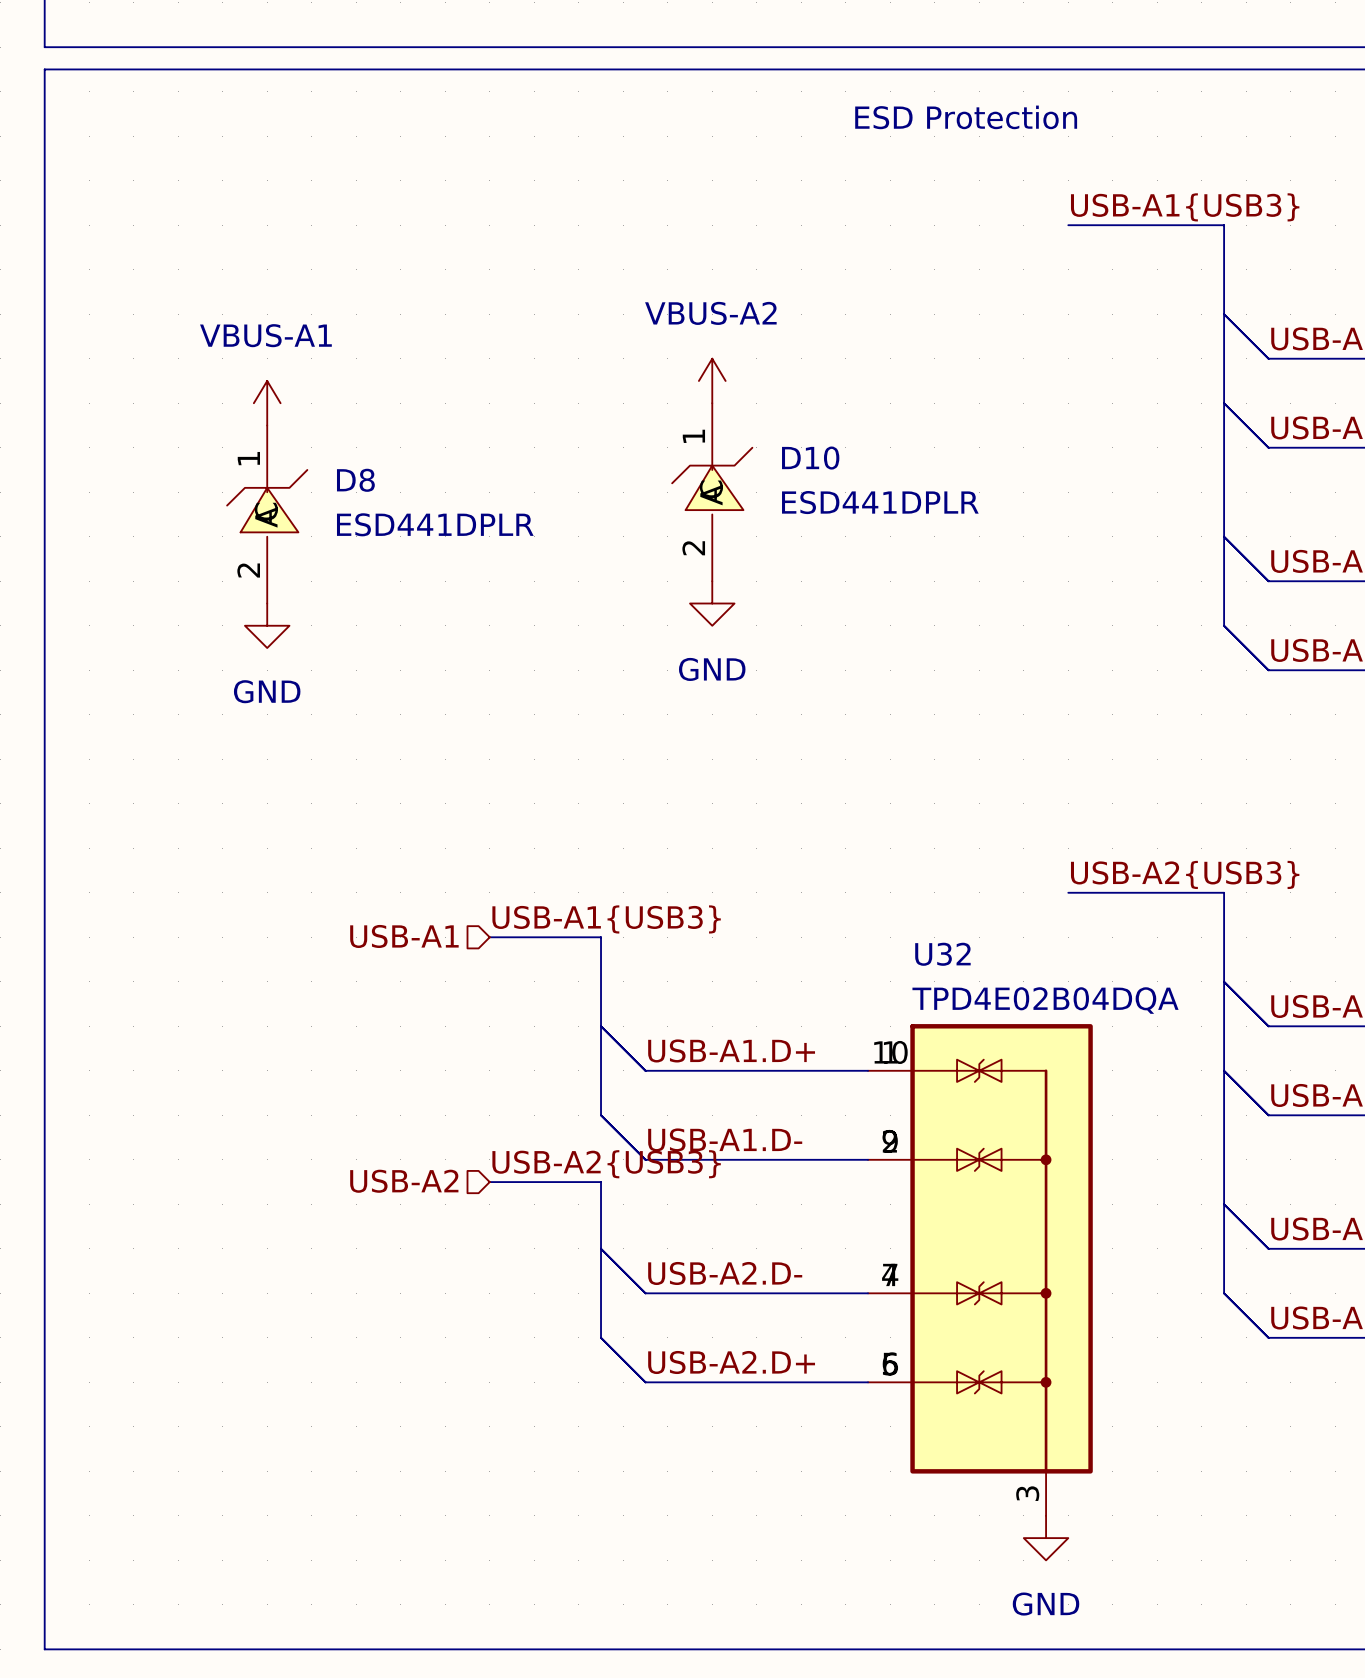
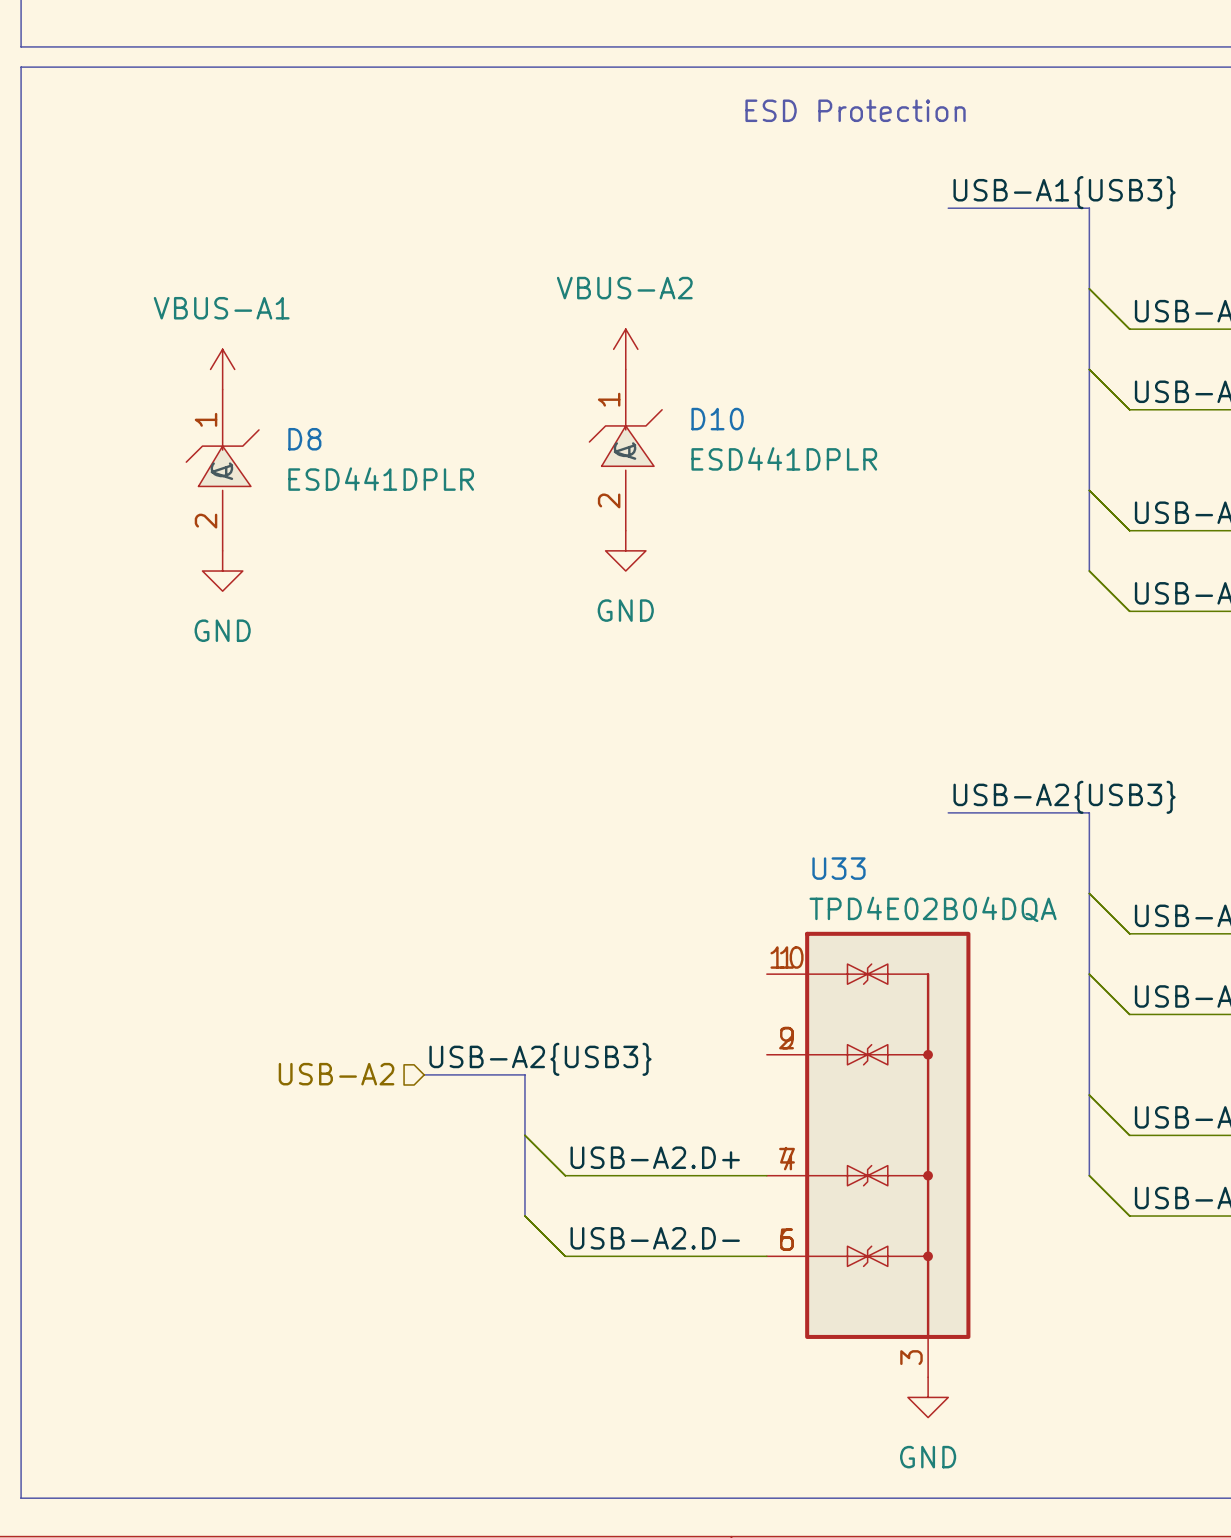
label: USB-A1{USB3} (606, 919) -> none
hierarchical label: USB-A1 (404, 936) -> none
bus: (489, 937) (601, 937) (601, 1115) -> none
U32 name: U32 (942, 954) -> U33 (838, 868)
wire: (601, 1026) (645, 1070) (868, 1070) -> none
label: USB-A1.D+ (731, 1050) -> none
wire: (601, 1115) (645, 1159) (868, 1159) -> none
label: USB-A1.D- (725, 1139) -> none
label: USB-A2.D- (725, 1273) -> USB-A2.D+ (655, 1157)
label: USB-A2.D+ (731, 1362) -> USB-A2.D- (655, 1238)

